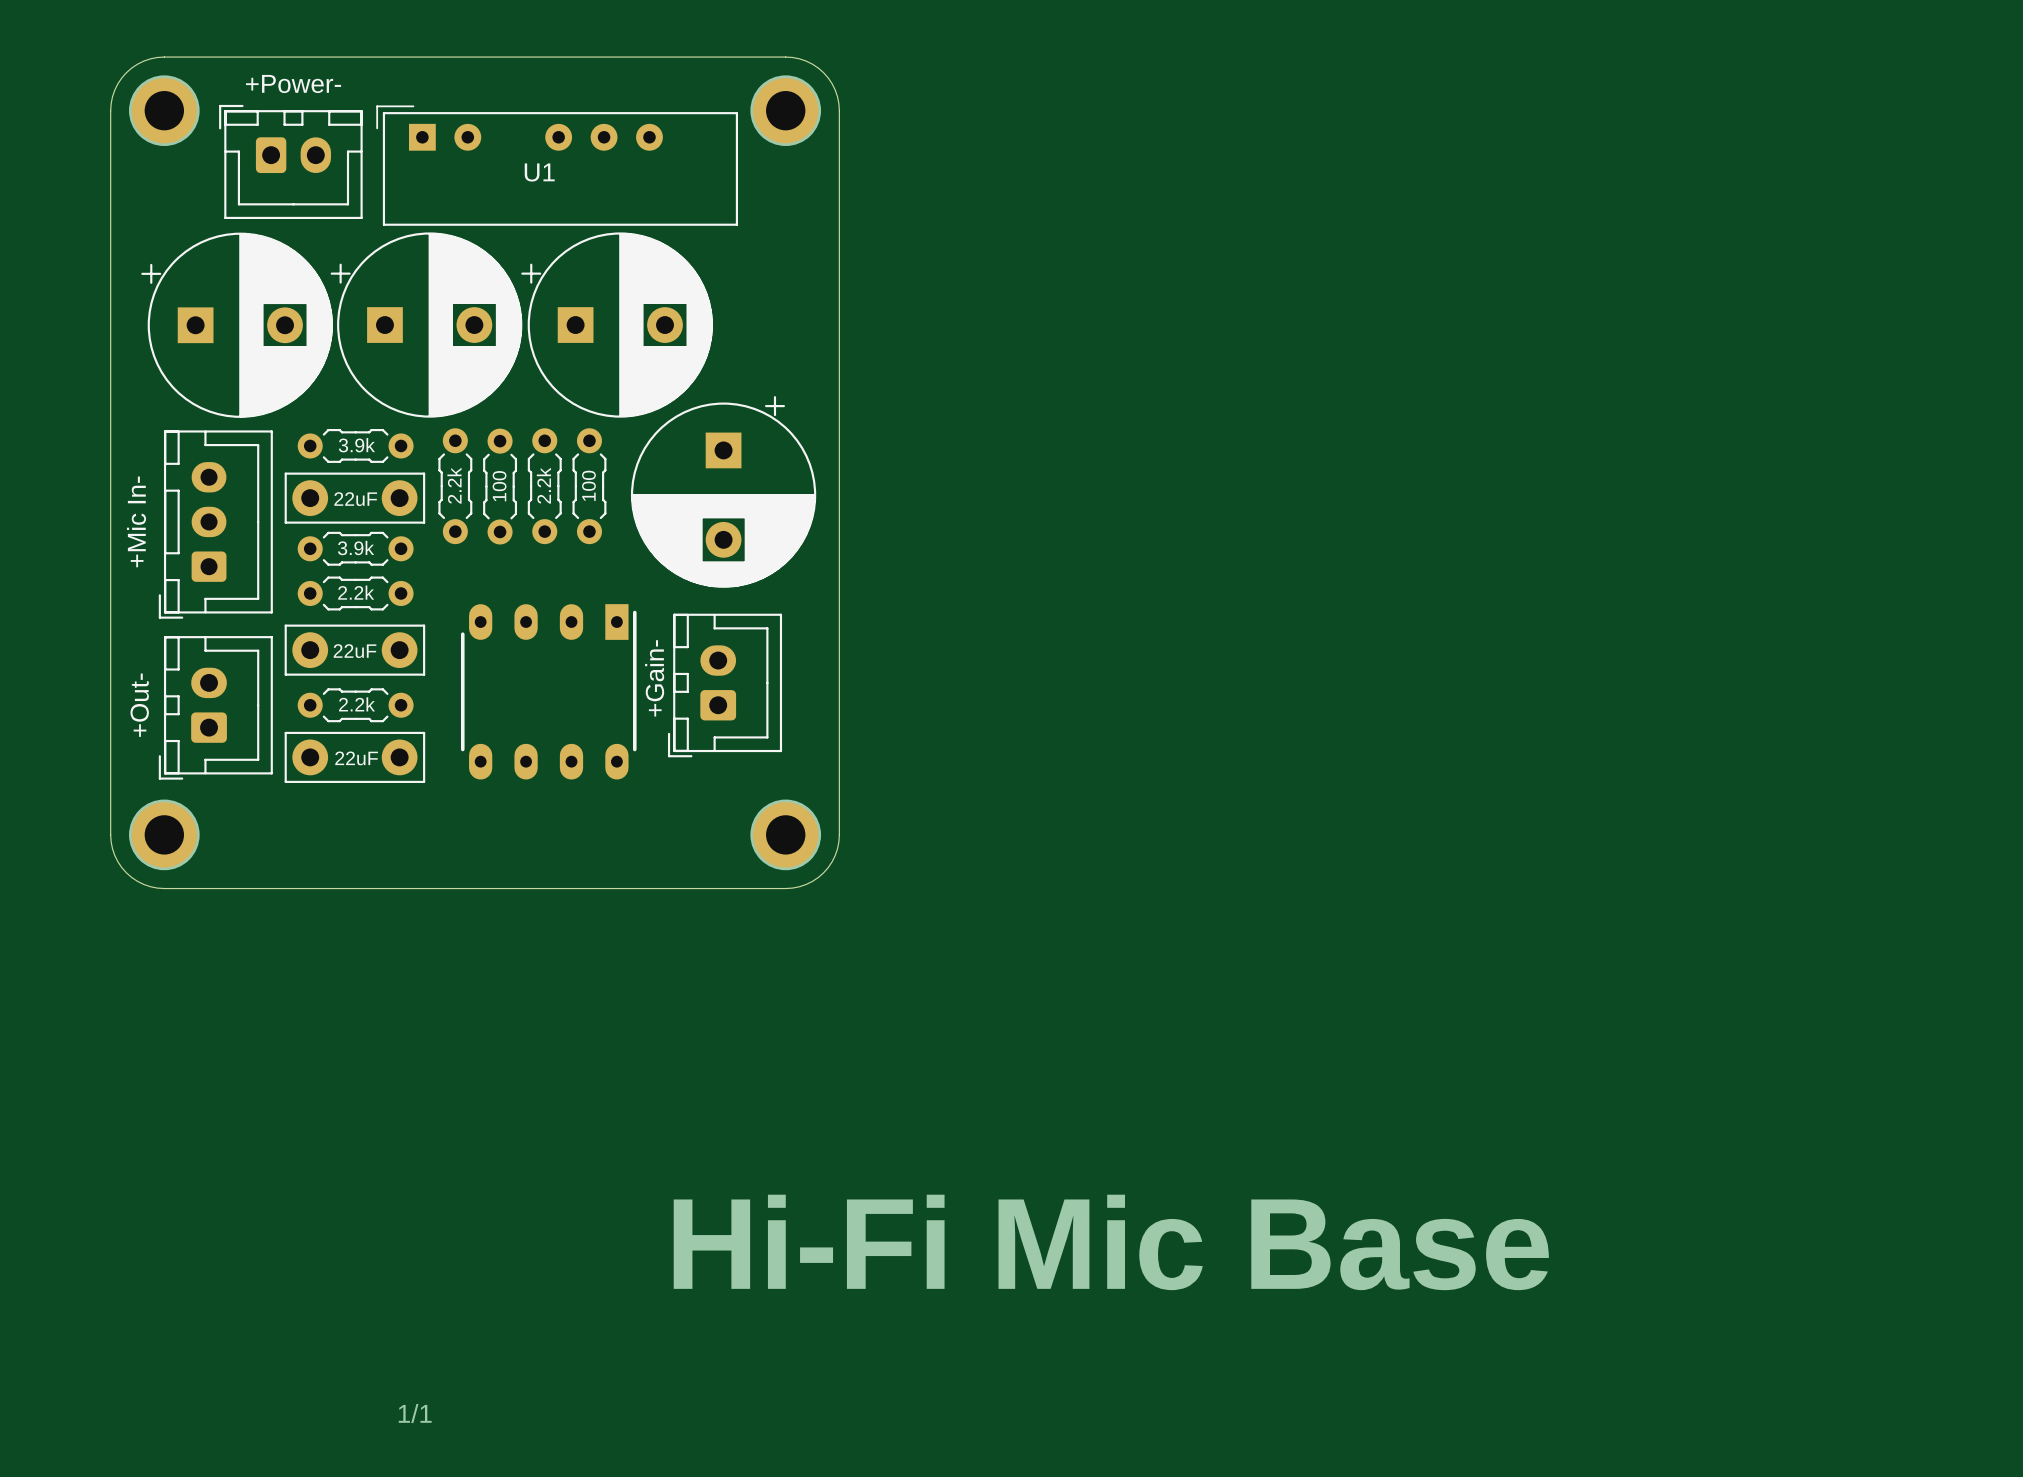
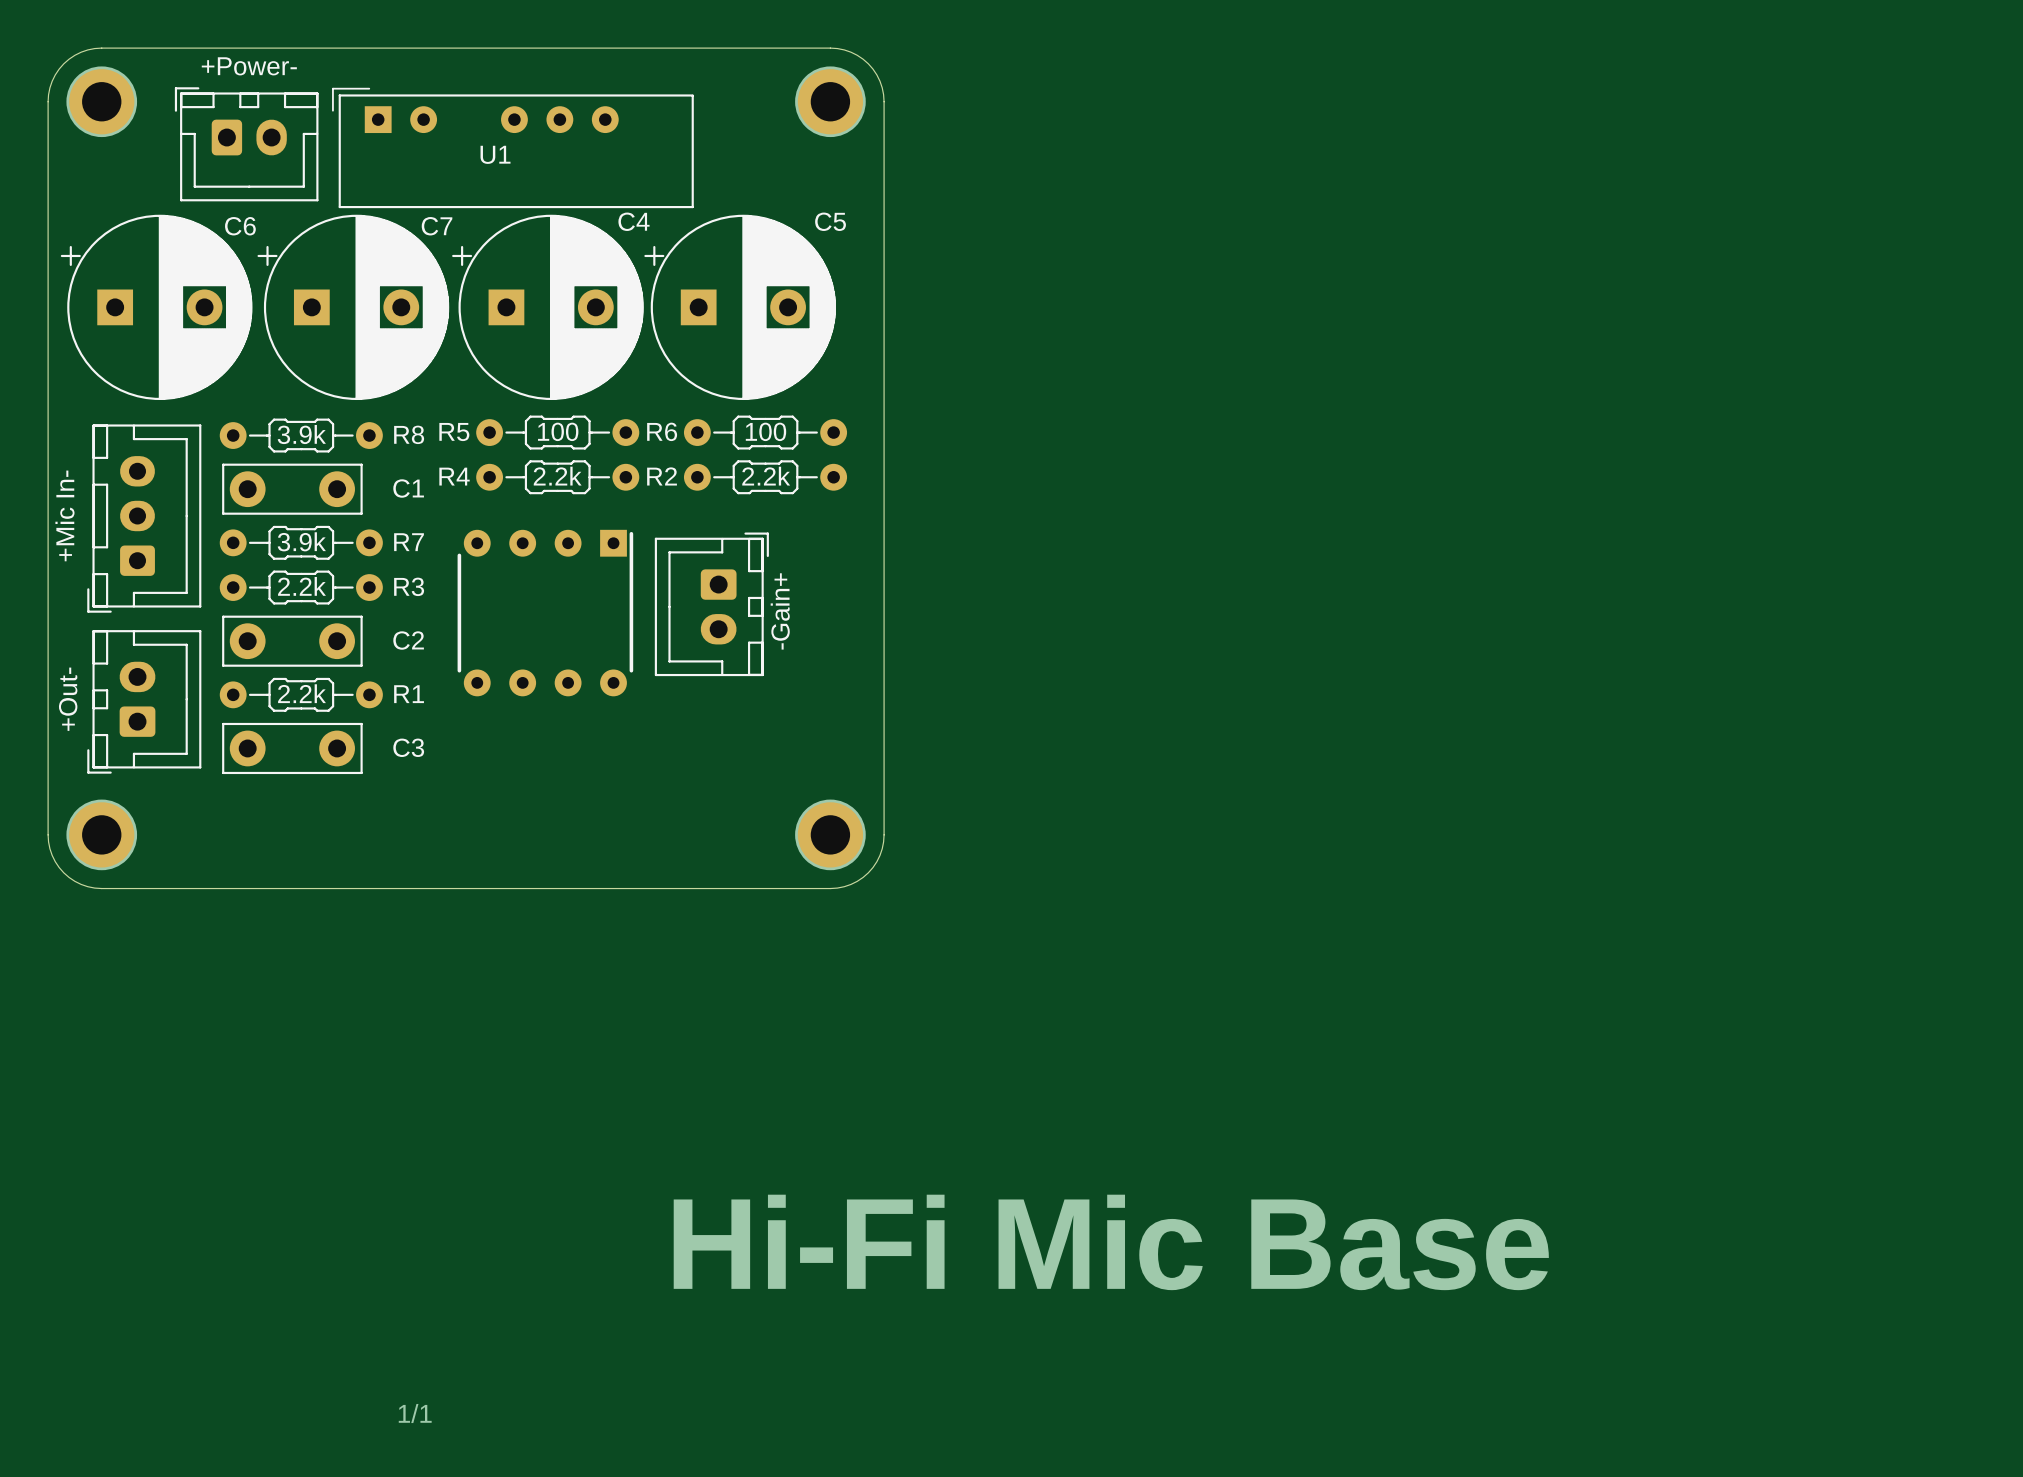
part position: (164, 110) -> (101, 101)
part position: (785, 110) -> (830, 101)
part position: (290, 161) -> (246, 144)
U1 position: (557, 165) -> (512, 147)
C6: none -> (156, 307)
C7: none -> (353, 307)
C4: none -> (547, 307)
C5: none -> (740, 307)
part: (237, 325) -> none
part: (426, 325) -> none
part: (617, 325) -> none
R5: none -> 100 (557, 432)
R6: none -> 100 (765, 432)
R8: none -> 3.9k (301, 435)
part: 3.9k (355, 445) -> none
R4: none -> 2.2k (557, 477)
R2: none -> 2.2k (765, 477)
part: 2.2k (455, 486) -> none
part: 100 (500, 486) -> none
part: 2.2k (544, 486) -> none
part: 100 (589, 486) -> none
C1: none -> (292, 489)
part: (723, 491) -> none
part: 22uF (354, 498) -> none
part position: (215, 524) -> (144, 518)
R7: none -> 3.9k (301, 542)
part: 3.9k (355, 548) -> none
R3: none -> 2.2k (301, 587)
part: 2.2k (355, 593) -> none
part: none -> -Gain+ (711, 604)
part: none -> (545, 613)
C2: none -> (292, 641)
part: 22uF (354, 650) -> none
part: +Gain- (725, 685) -> none
part: (548, 691) -> none
R1: none -> 2.2k (301, 694)
part: 2.2k (355, 705) -> none
part position: (215, 707) -> (144, 701)
C3: none -> (292, 748)
part: 22uF (354, 757) -> none
part position: (164, 834) -> (101, 834)
part position: (785, 834) -> (830, 834)
board edge: (164, 888) (143, 884) (126, 872) (114, 855) (110, 834) (111, 103) (117, 83) (131, 68) (150, 58) (164, 57) (785, 57) (799, 58) (812, 64) (828, 78) (835, 90) (839, 110) (839, 834) (835, 855) (823, 872) (806, 884) (785, 888) -> (164, 888) (101, 888) (81, 884) (69, 877) (59, 867) (52, 855) (48, 841) (48, 101) (49, 87) (59, 69) (74, 55) (94, 48) (830, 48) (850, 52) (863, 59) (872, 69) (879, 81) (884, 101) (883, 841) (879, 855) (872, 867) (863, 877) (850, 884) (830, 888) (785, 888)

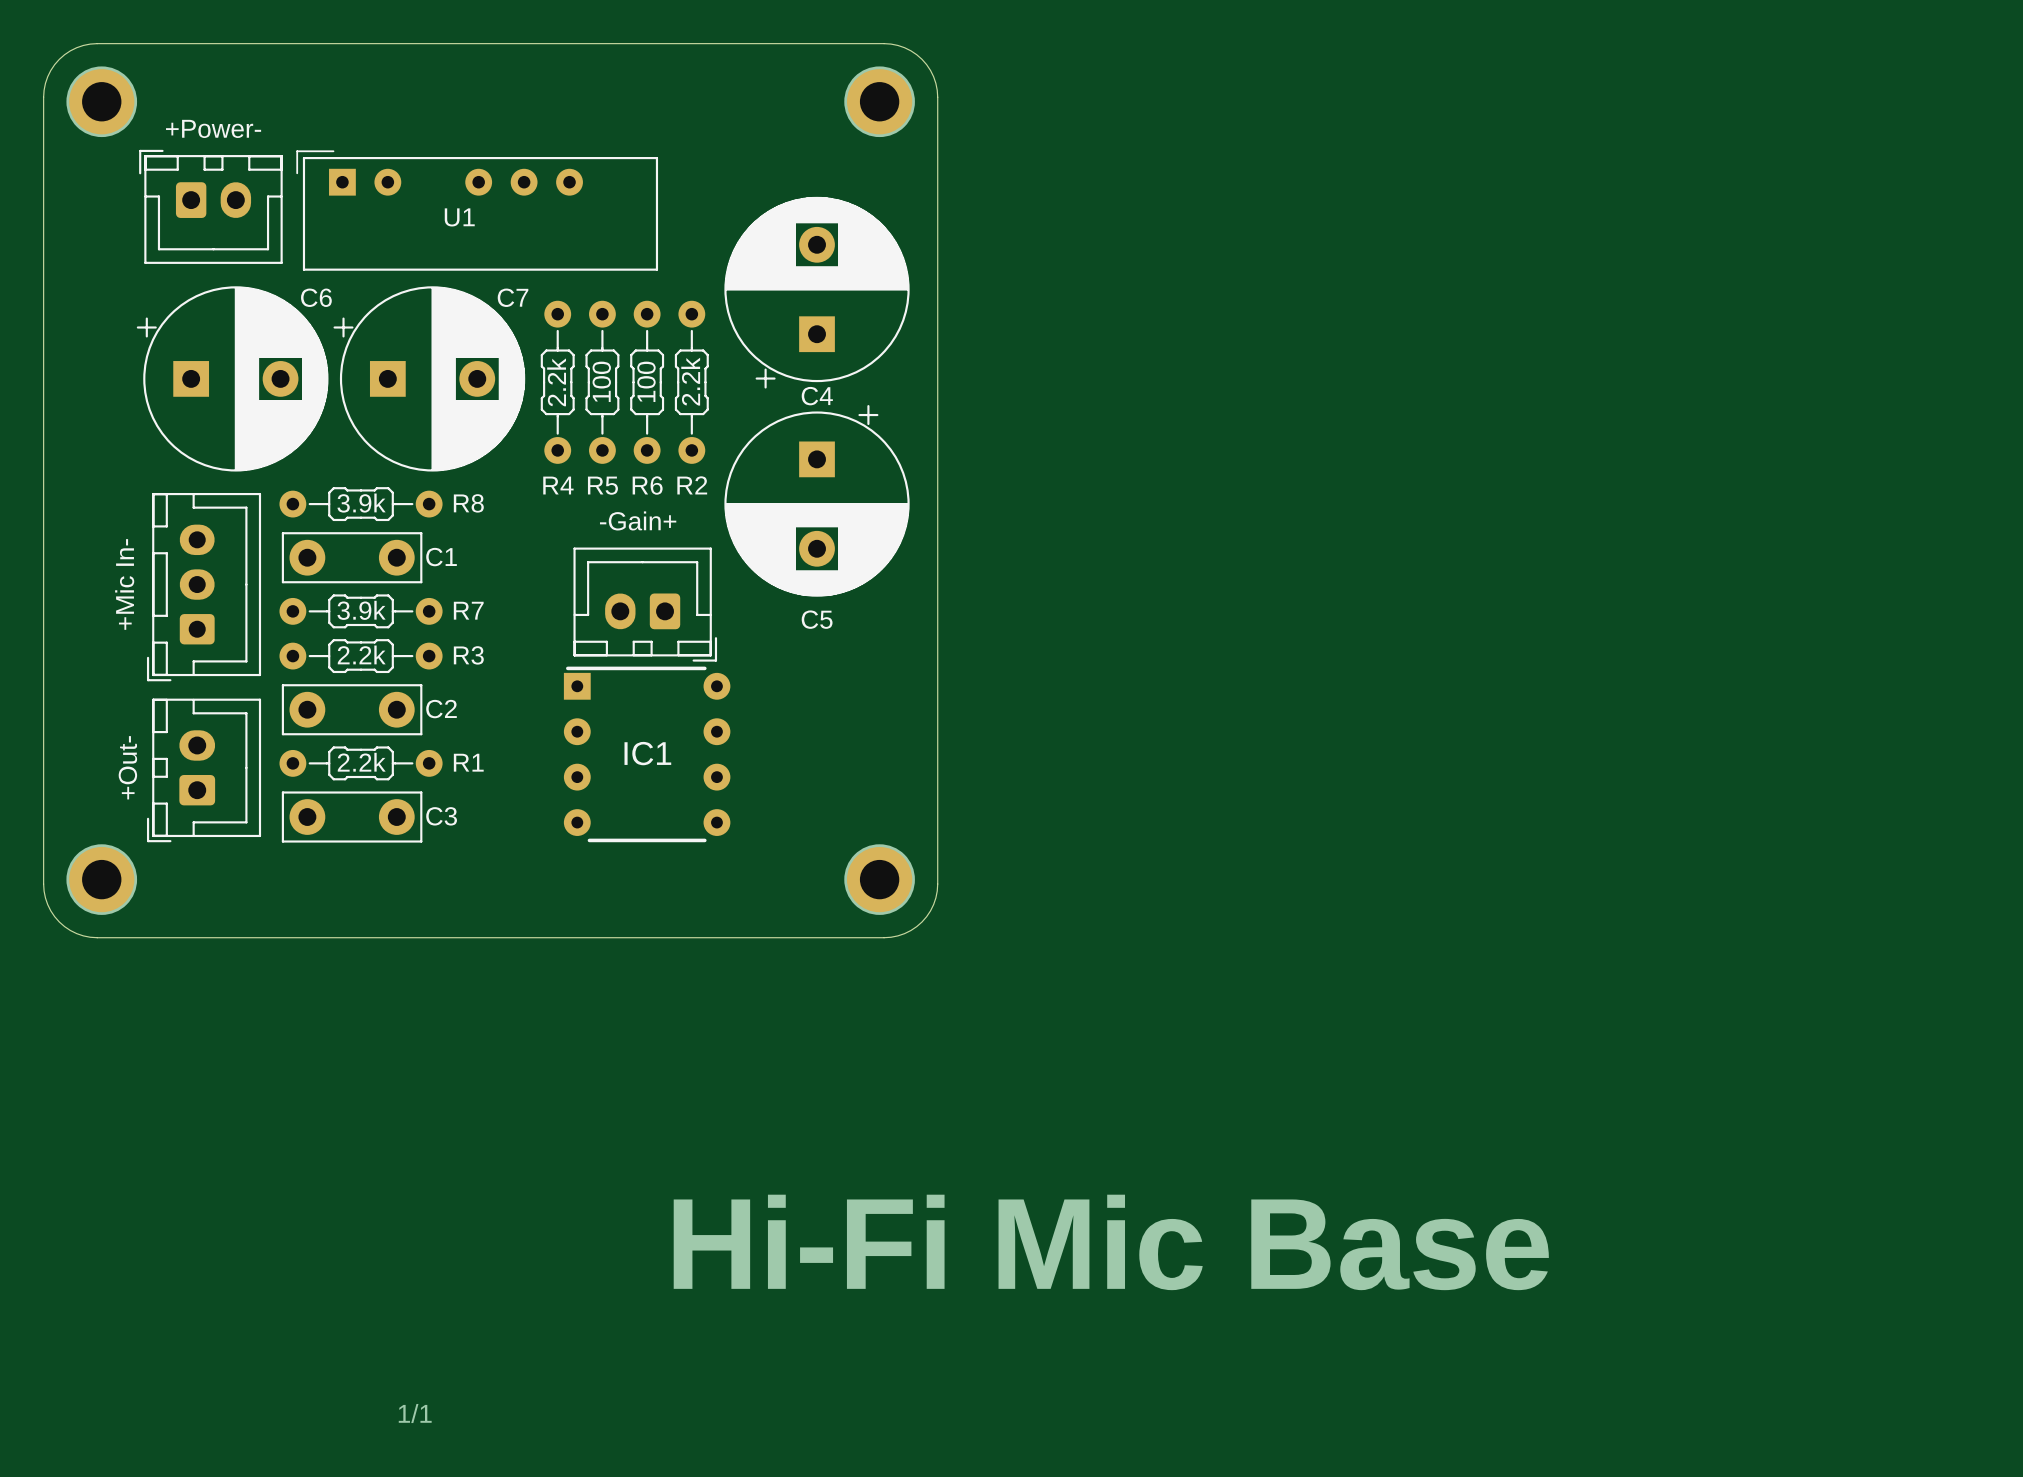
board edge: (101, 48) (830, 48) (850, 52) (868, 63) (879, 81) (884, 101) (884, 834) (879, 855) (868, 872) (850, 884) (830, 888) (101, 888) (81, 884) (63, 872) (52, 855) (48, 834) (48, 101) (52, 81) (63, 63) (81, 52) (101, 48) -> (97, 43) (76, 47) (59, 59) (47, 76) (43, 97) (43, 884) (47, 904) (59, 922) (76, 933) (97, 937) (884, 937) (904, 933) (922, 922) (933, 904) (937, 884) (937, 97) (933, 76) (922, 59) (904, 47) (884, 43) (97, 43)
part position: (830, 101) -> (879, 101)
part position: (246, 144) -> (210, 206)
U1 position: (512, 147) -> (477, 210)
C4 name position: C4 (634, 221) -> C4 (817, 396)
C5 name position: C5 (830, 221) -> C5 (817, 619)
C6 position: (156, 307) -> (232, 378)
C7 position: (353, 307) -> (429, 378)
C4 rotation: 0° (547, 307) -> 90° counterclockwise (817, 292)
C4 position: (547, 307) -> (817, 292)
C5 rotation: 0° (740, 307) -> 90° clockwise (817, 500)
C5 position: (740, 307) -> (817, 500)
R5 rotation: 0° (557, 432) -> 90° counterclockwise (602, 382)
R6 rotation: 0° (765, 432) -> 90° counterclockwise (647, 382)
R6 position: (765, 432) -> (647, 382)
R8 position: (301, 435) -> (361, 504)
R4 rotation: 0° (557, 477) -> 90° counterclockwise (557, 382)
R2 rotation: 0° (765, 477) -> 90° counterclockwise (691, 382)
R2 position: (765, 477) -> (691, 382)
C1 name position: C1 (408, 488) -> C1 (441, 557)
C1 position: (292, 489) -> (352, 557)
part position: (144, 518) -> (204, 587)
R7 position: (301, 542) -> (361, 611)
R3 position: (301, 587) -> (361, 656)
part rotation: 0° (711, 604) -> 90° clockwise (645, 604)
part value position: -Gain+ (780, 611) -> -Gain+ (638, 520)
part: (545, 613) -> none
C2 name position: C2 (408, 640) -> C2 (441, 709)
C2 position: (292, 641) -> (352, 709)
R1 position: (301, 694) -> (361, 763)
part position: (144, 701) -> (204, 770)
C3 name position: C3 (408, 747) -> C3 (441, 816)
C3 position: (292, 748) -> (352, 817)
IC1: none -> (647, 754)
part position: (101, 834) -> (101, 879)
part position: (830, 834) -> (879, 879)

